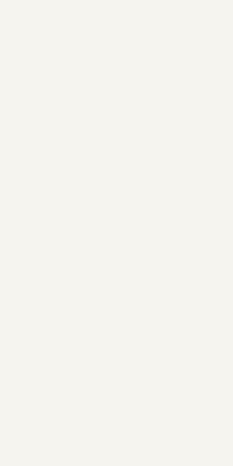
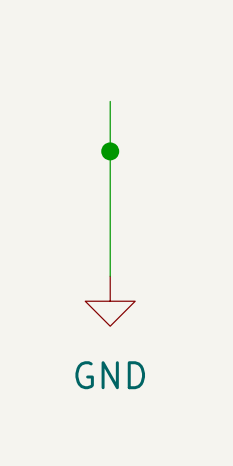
wire: none -> (110, 101) (110, 276)
junction: none -> (110, 151)
power symbol: none -> GND (110, 301)

